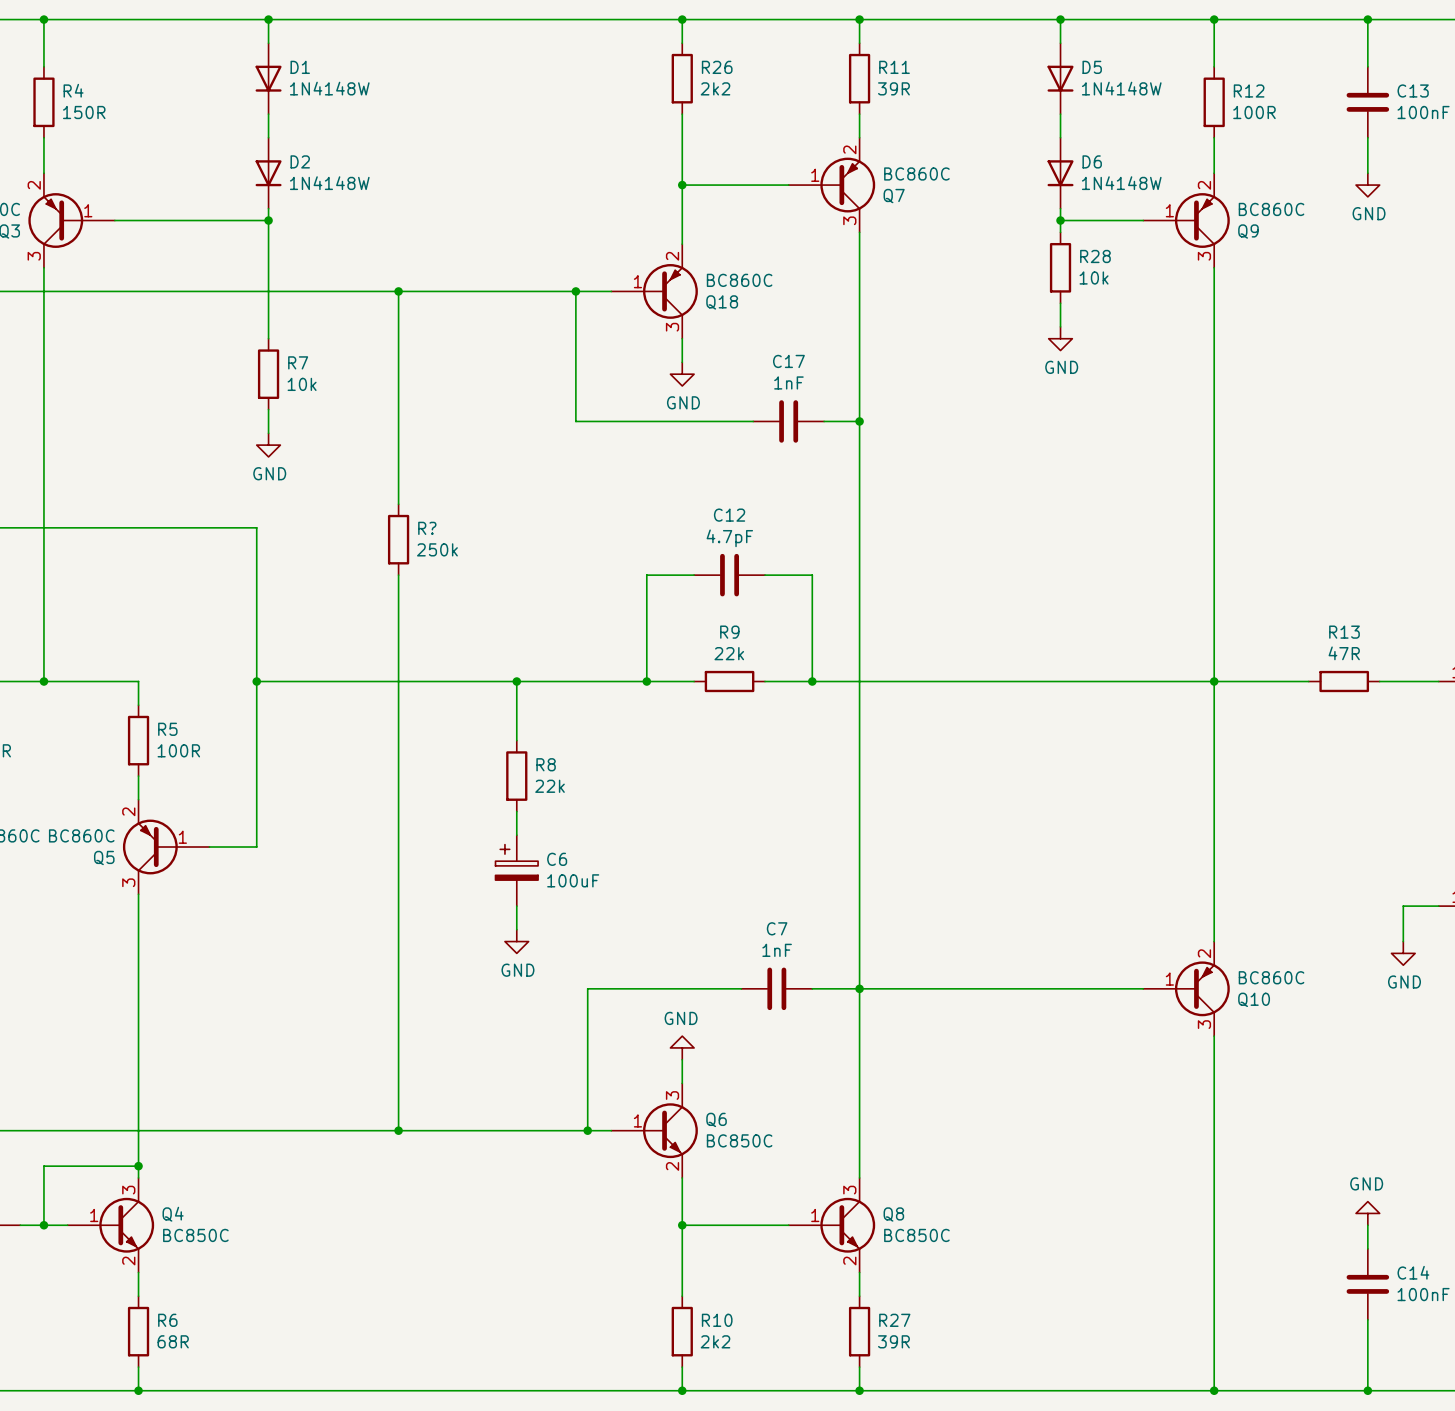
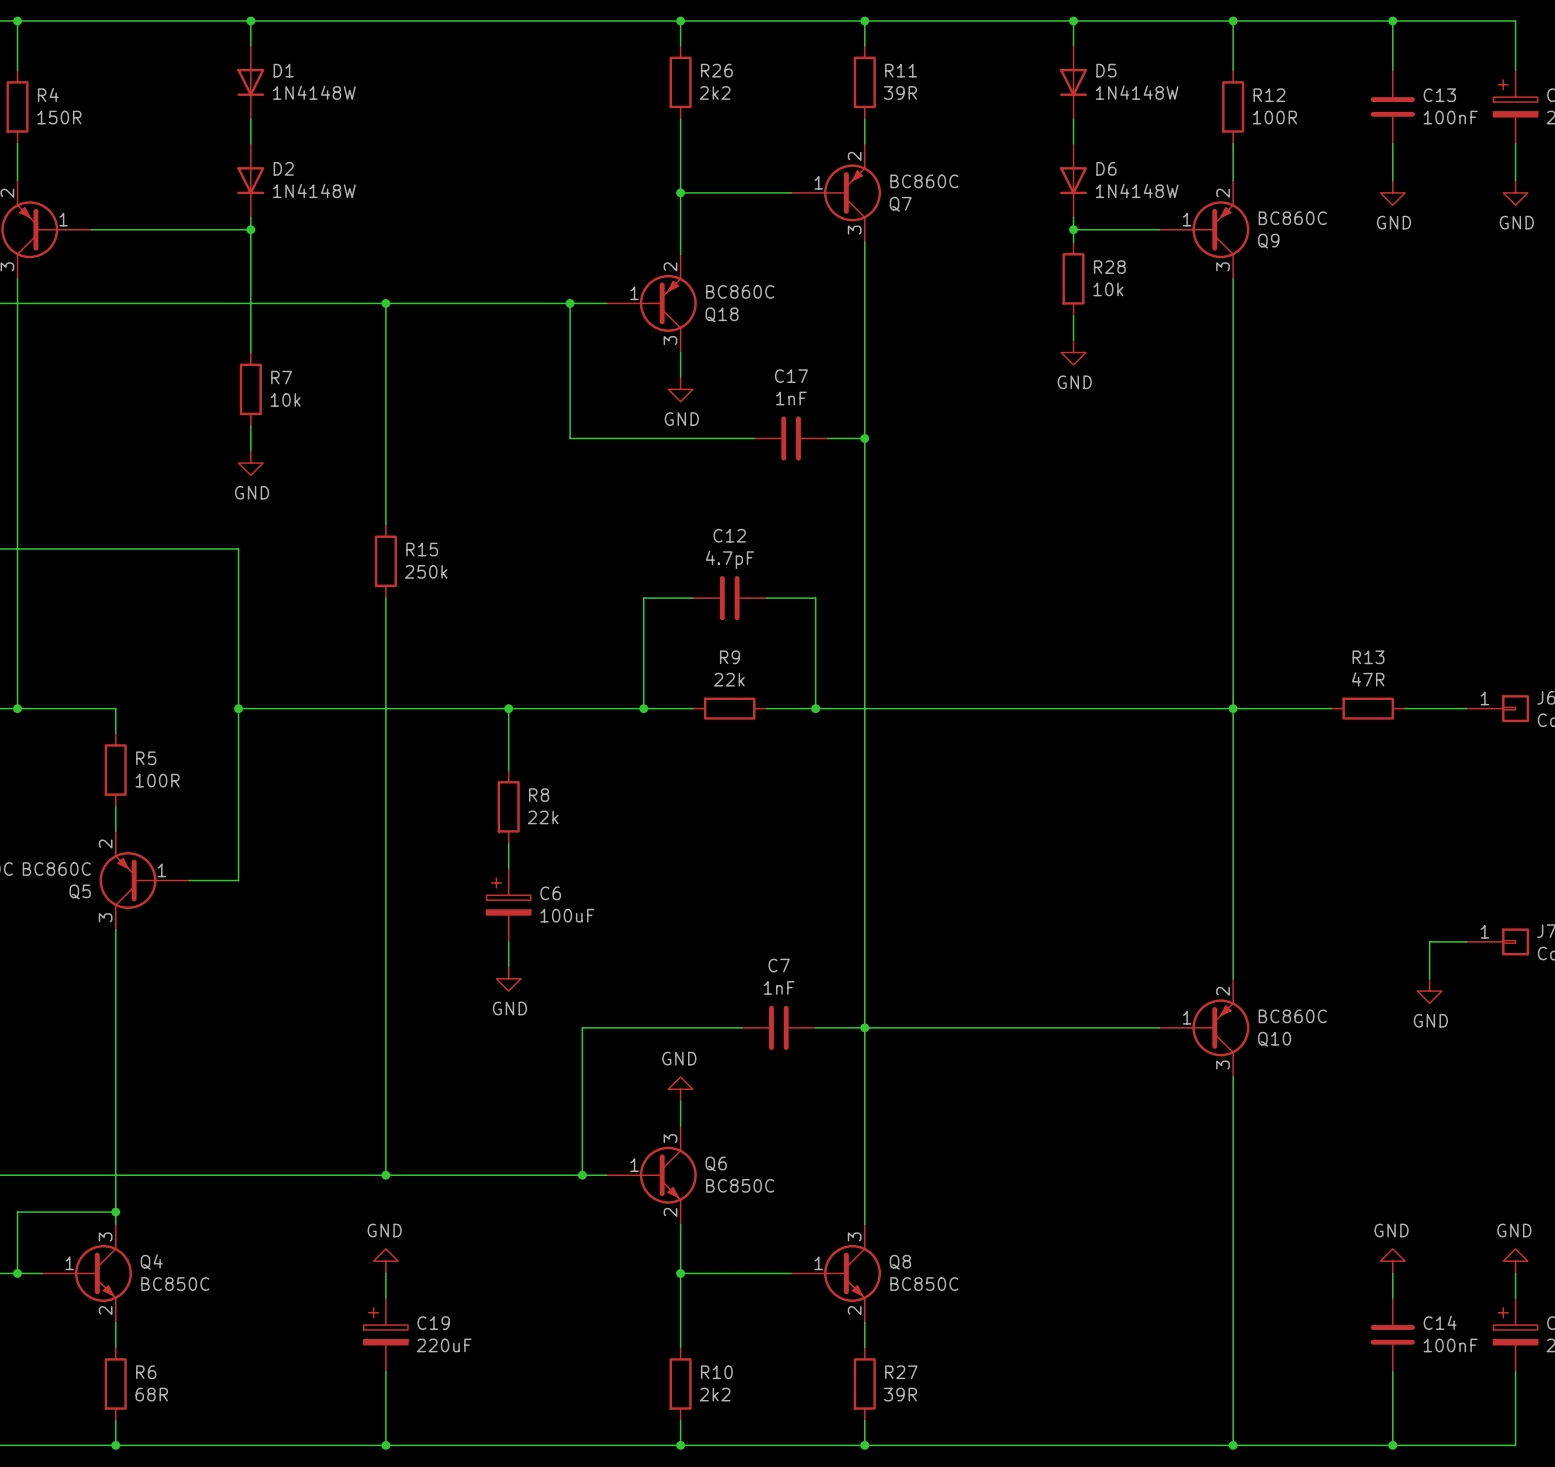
R? name: R? (427, 528) -> R15 (422, 549)
power symbol: none -> GND (385, 1261)
wire: none -> (385, 1273) (385, 1298)
C19: none -> 220uF (385, 1334)
wire: none -> (385, 1371) (385, 1445)
junction: none -> (385, 1445)

